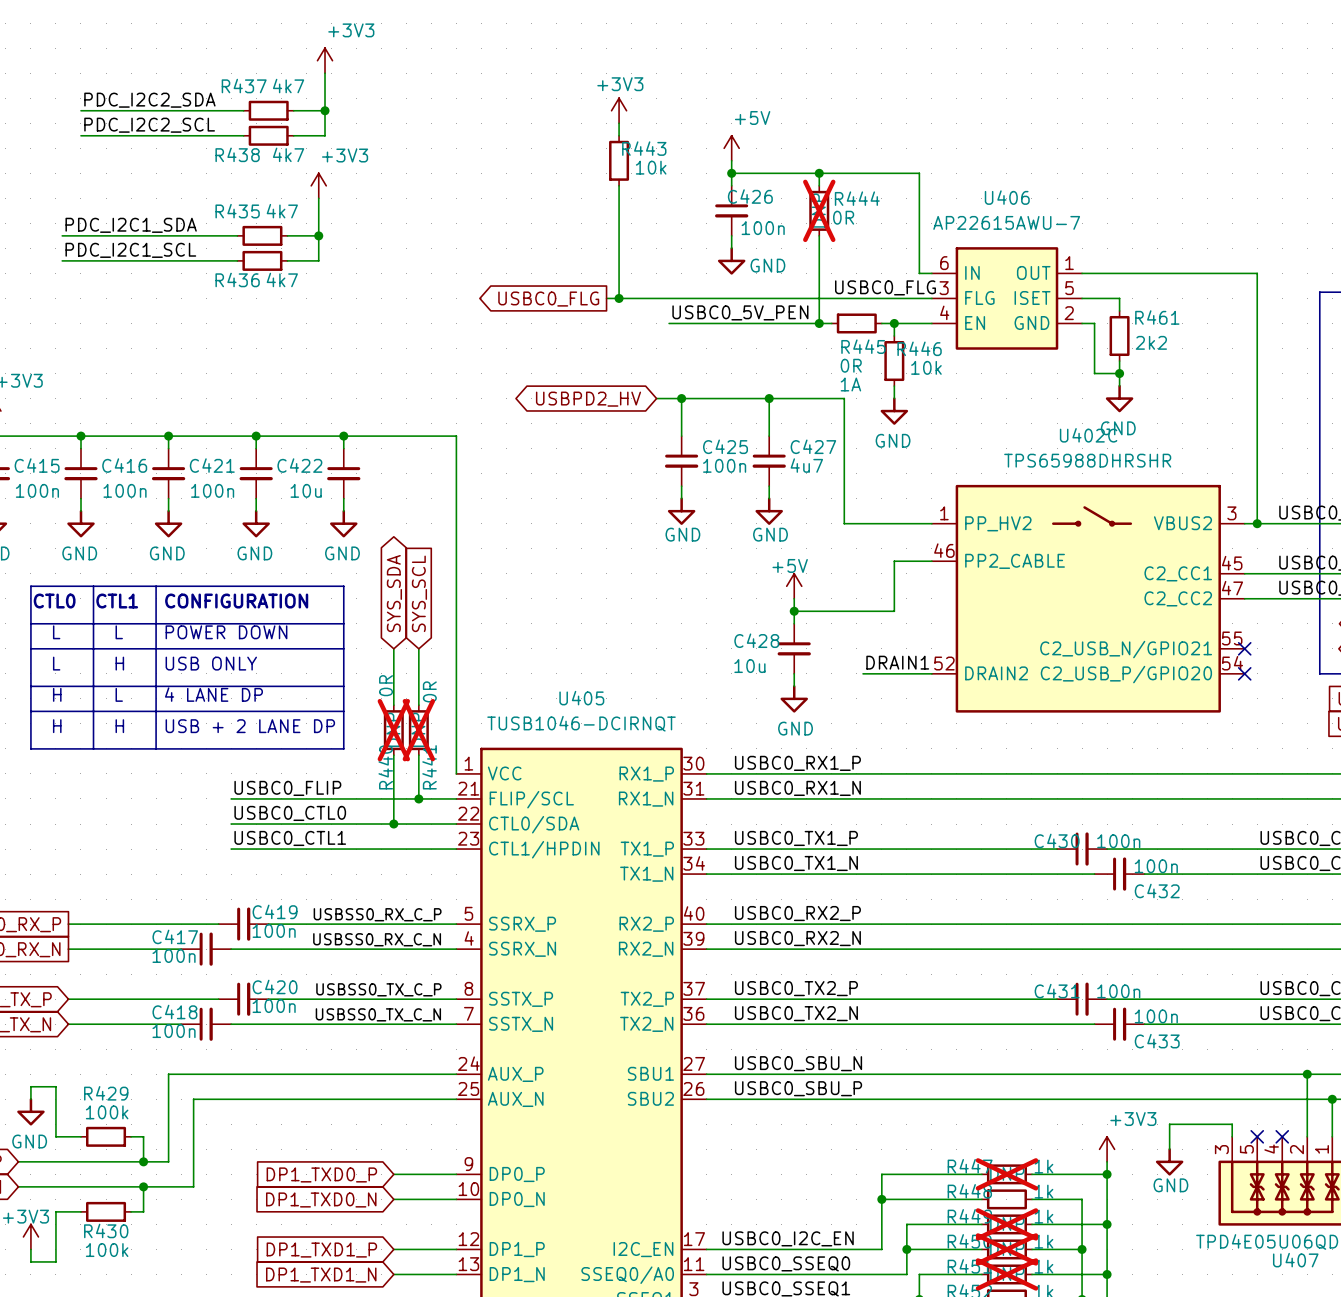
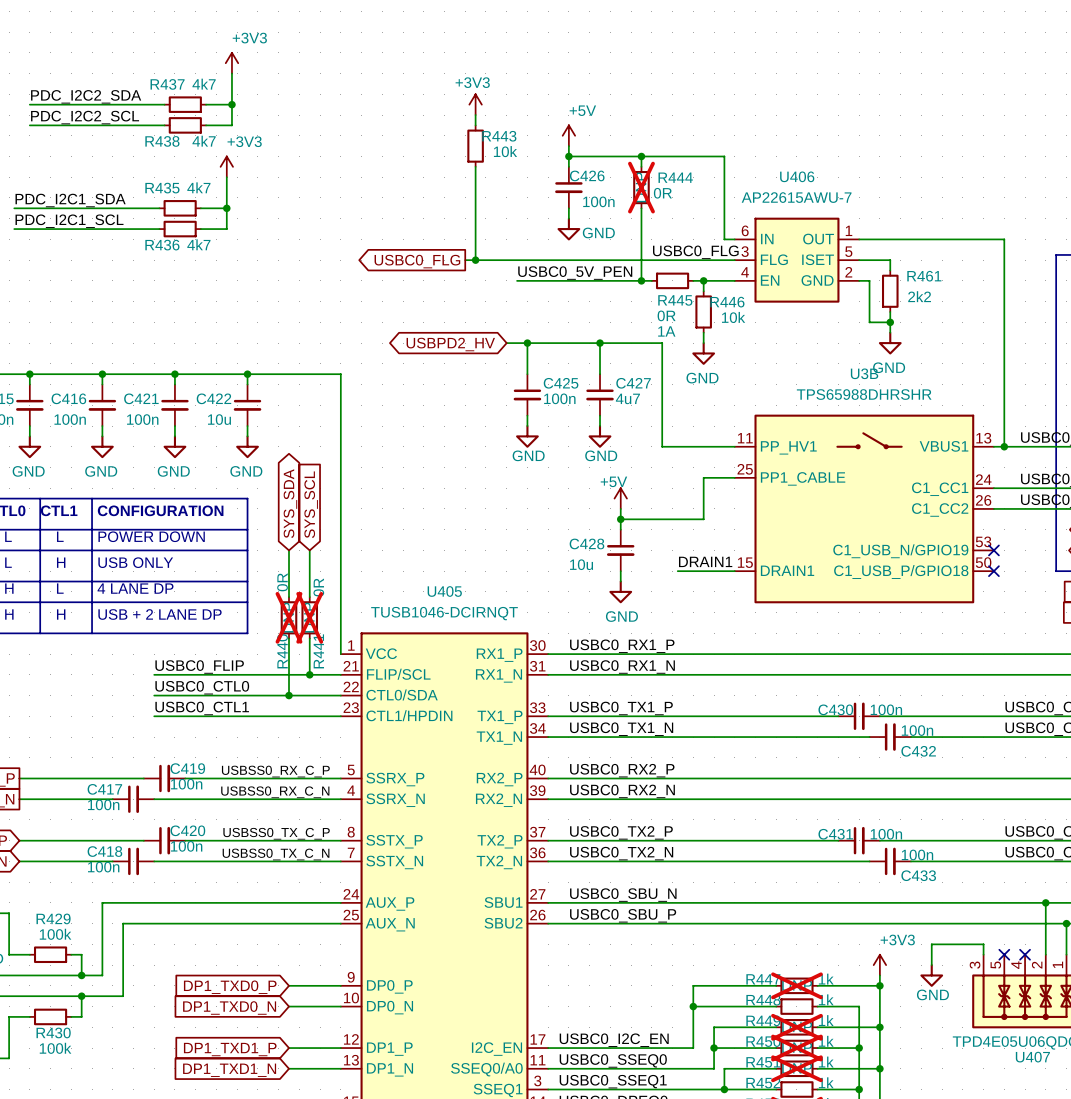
U402C: (1088, 598) -> none
U3B: none -> (864, 508)

